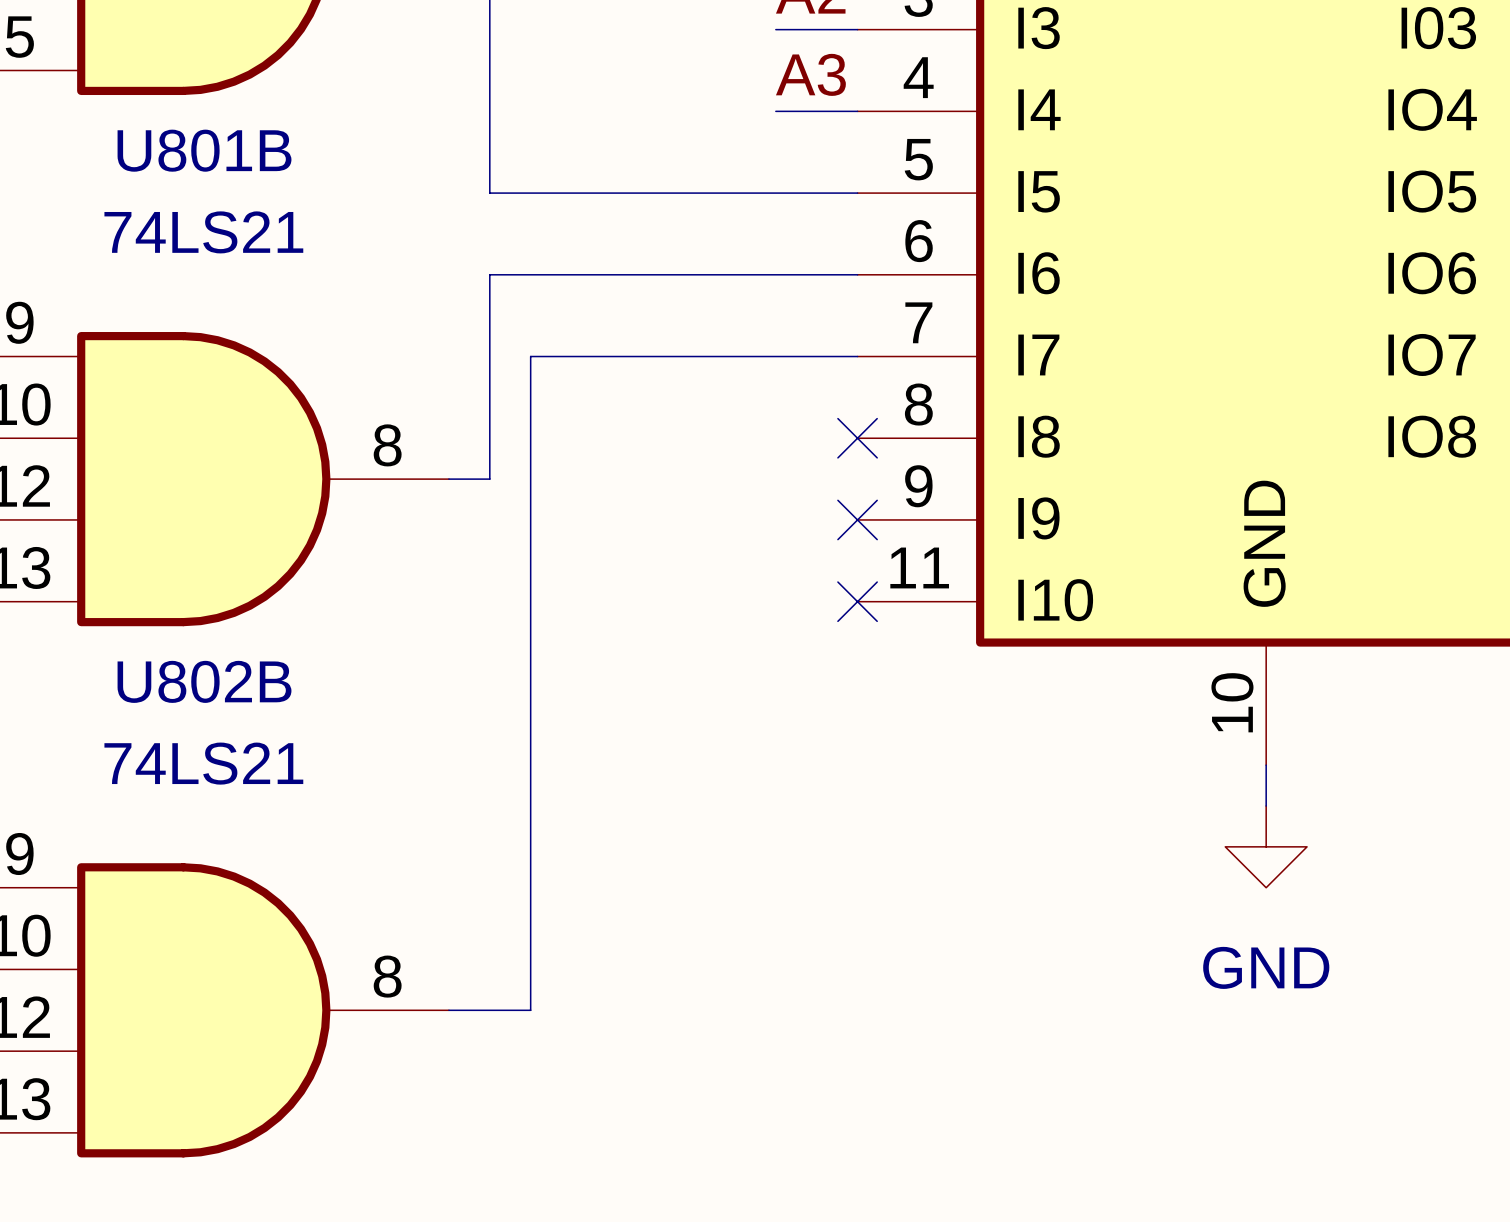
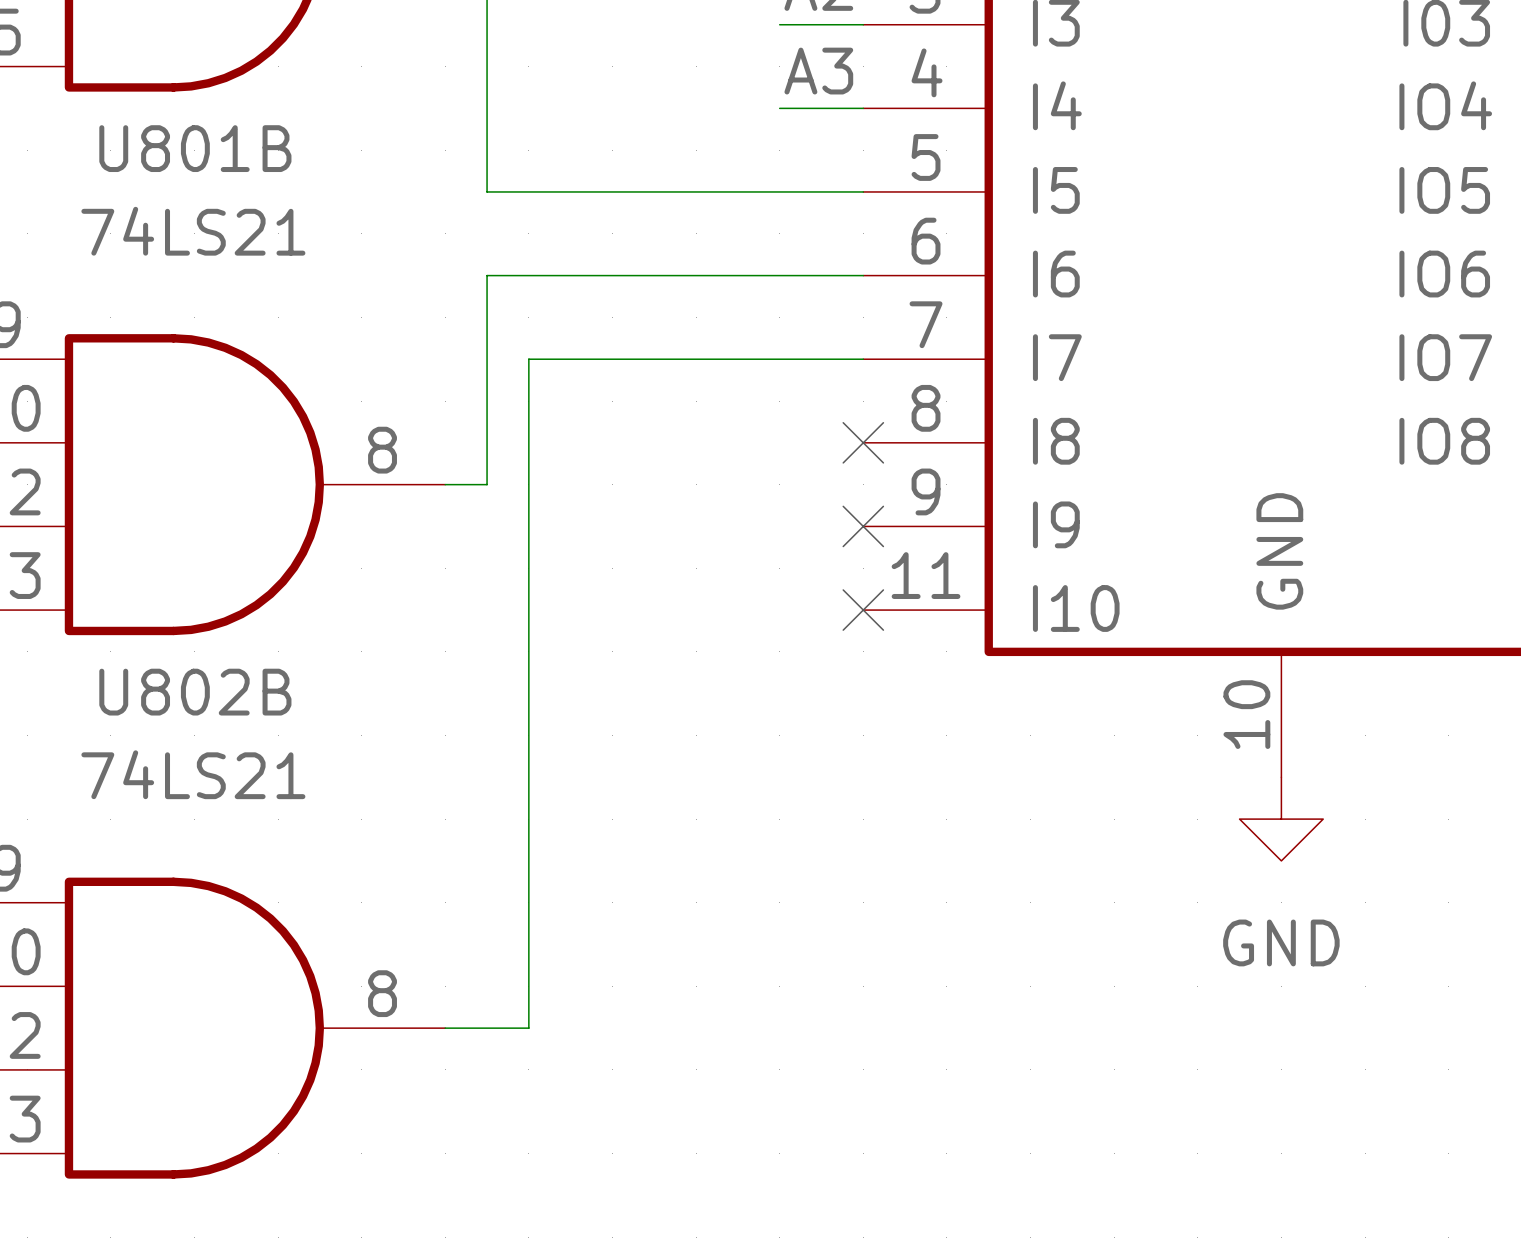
power symbol position: GND (1266, 846) -> GND (1281, 819)

